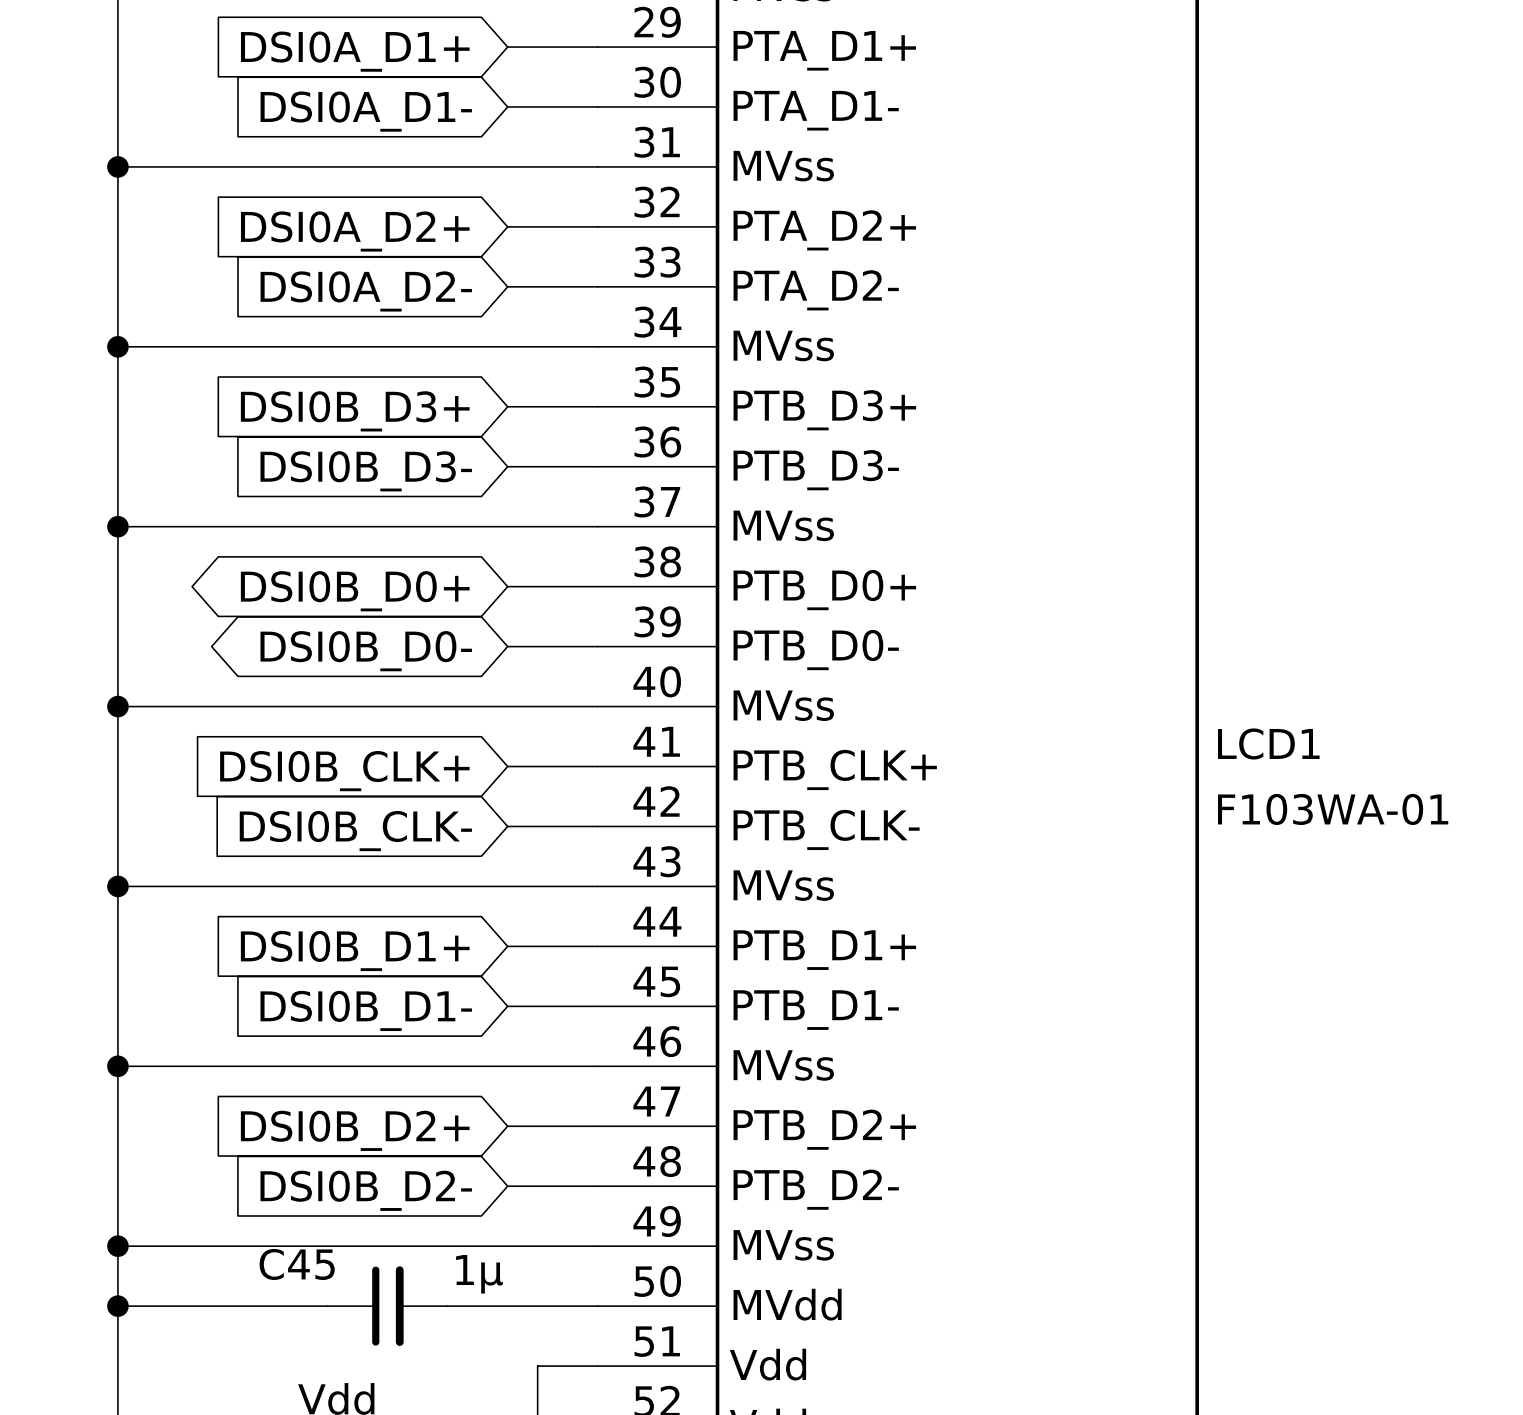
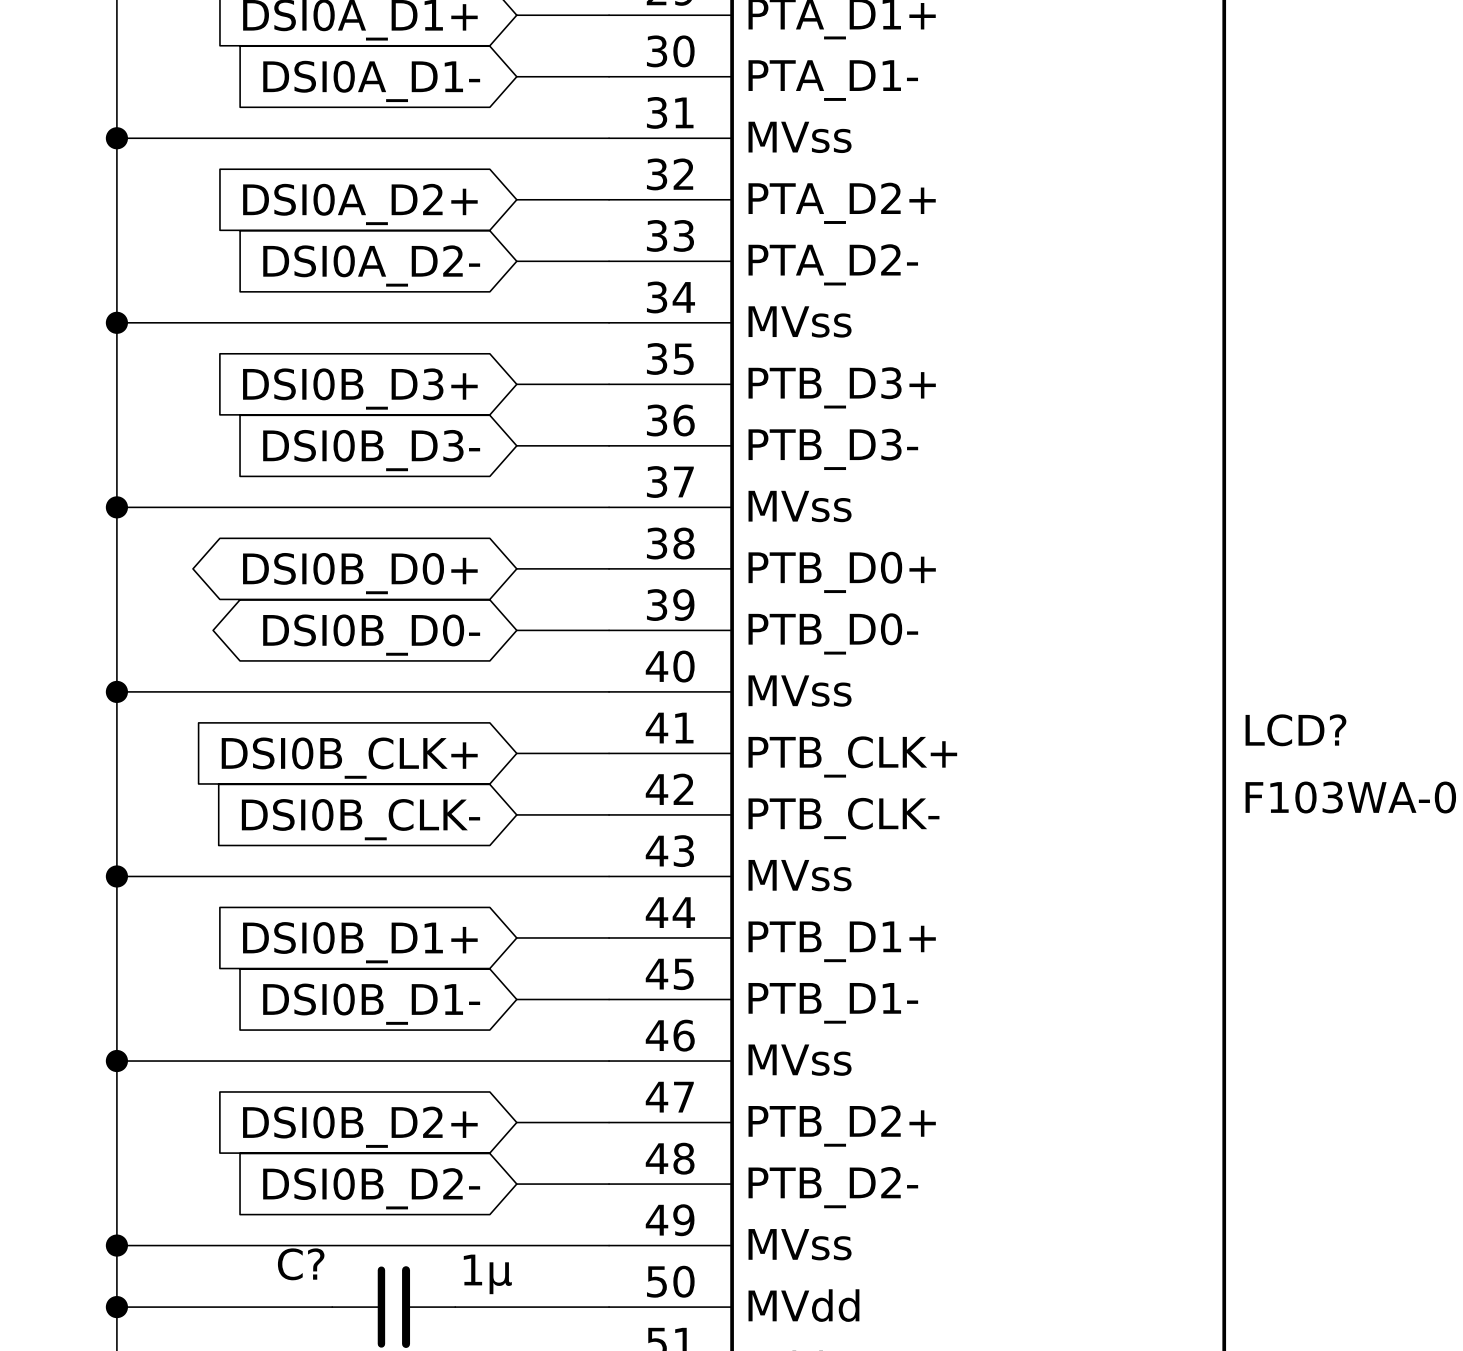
LCD1 name: LCD1 (1268, 743) -> LCD? (1295, 730)
C45 name: C45 (297, 1264) -> C? (301, 1264)

